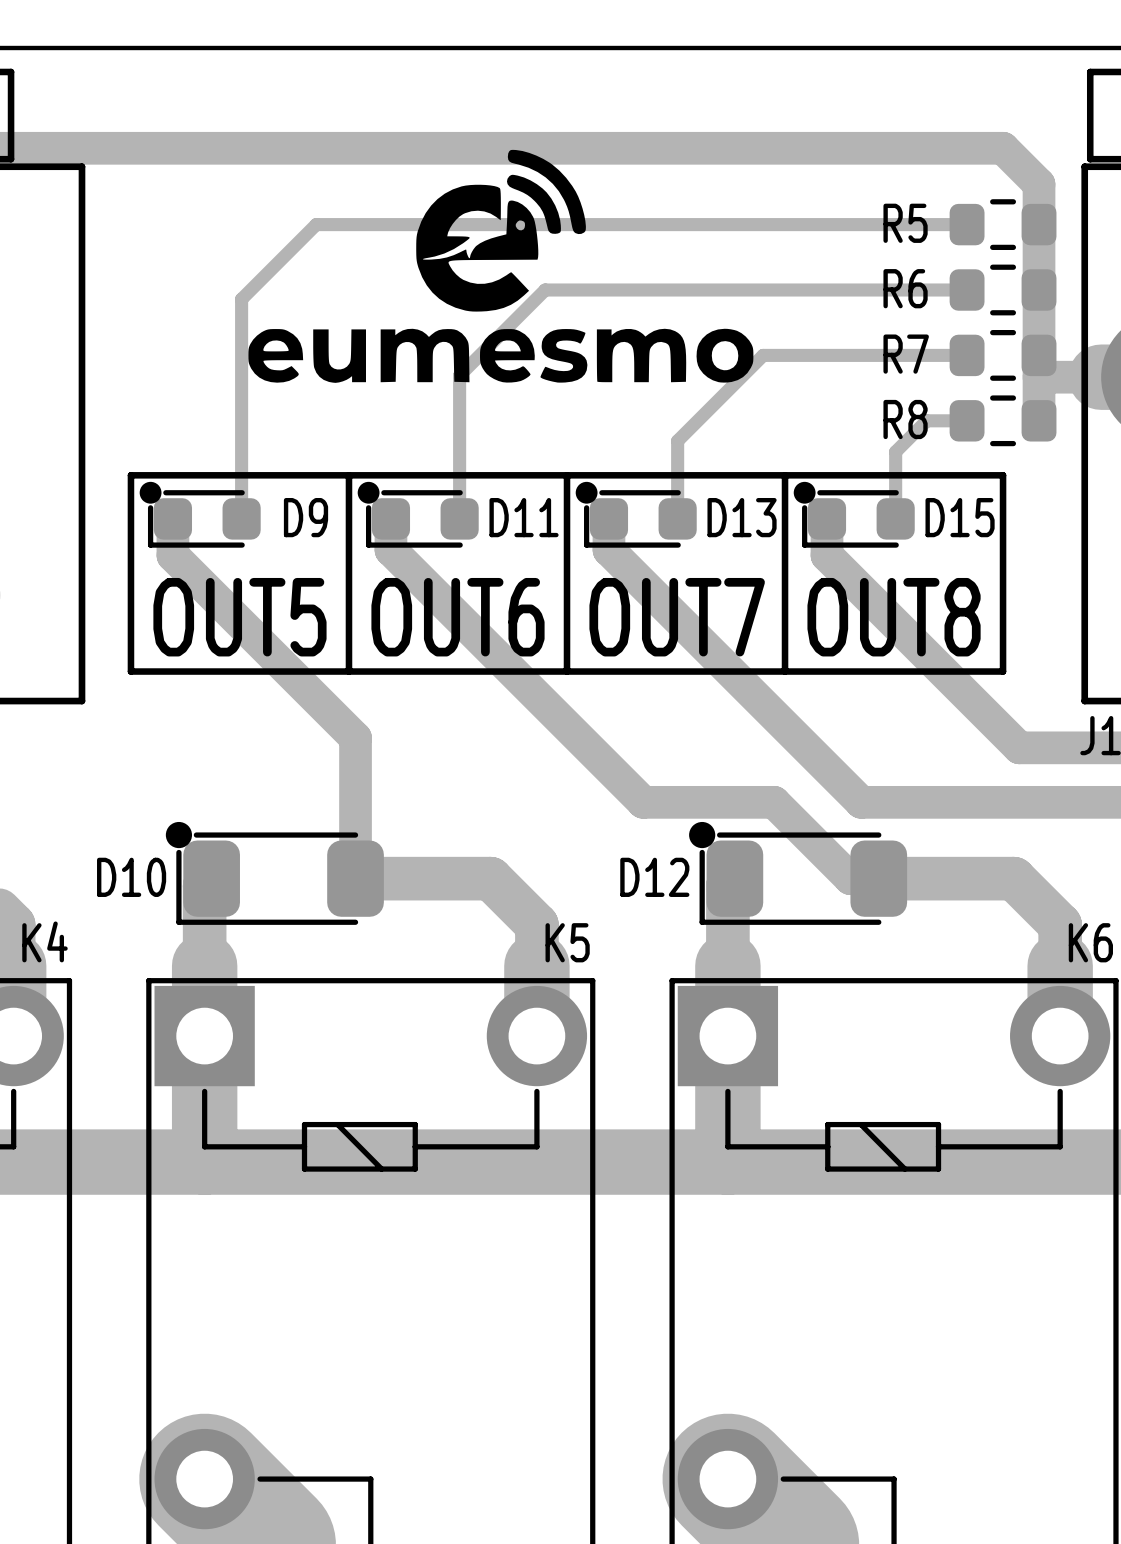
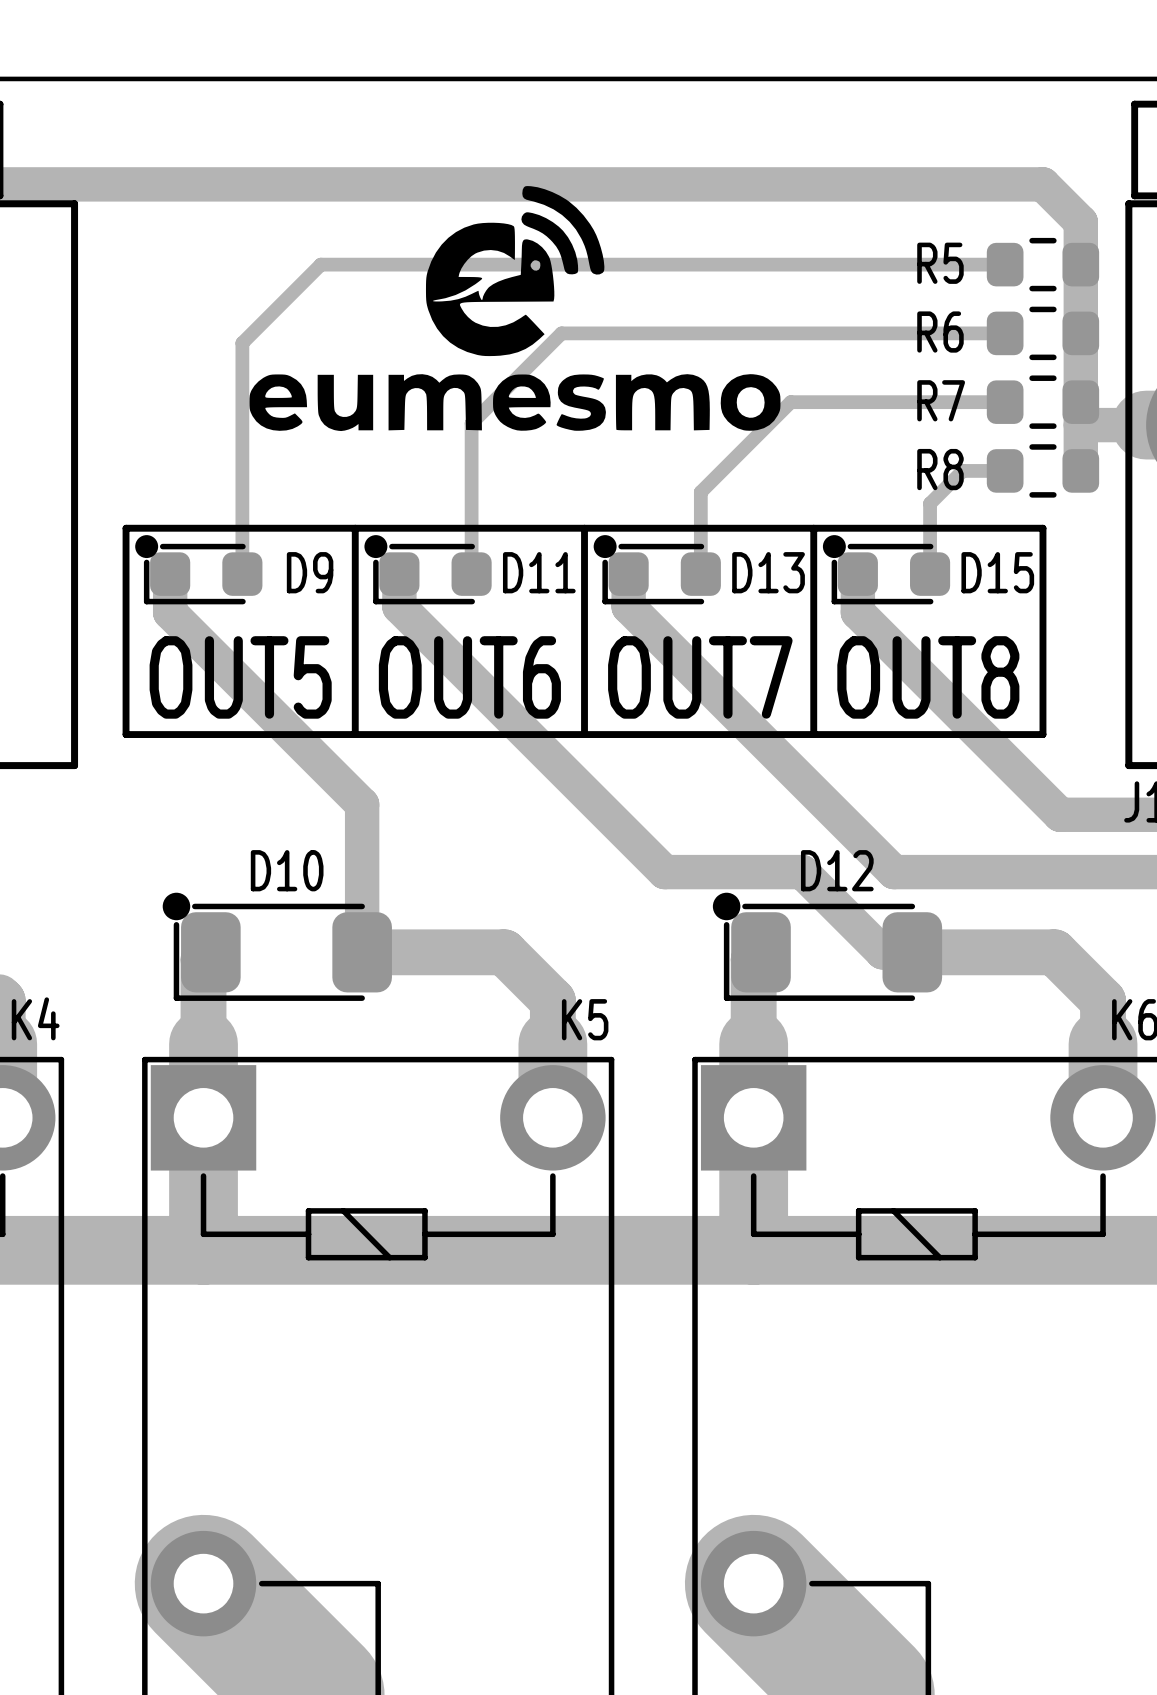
D10 name position: D10 (131, 877) -> D10 (287, 870)
D12 name position: D12 (654, 877) -> D12 (837, 870)

